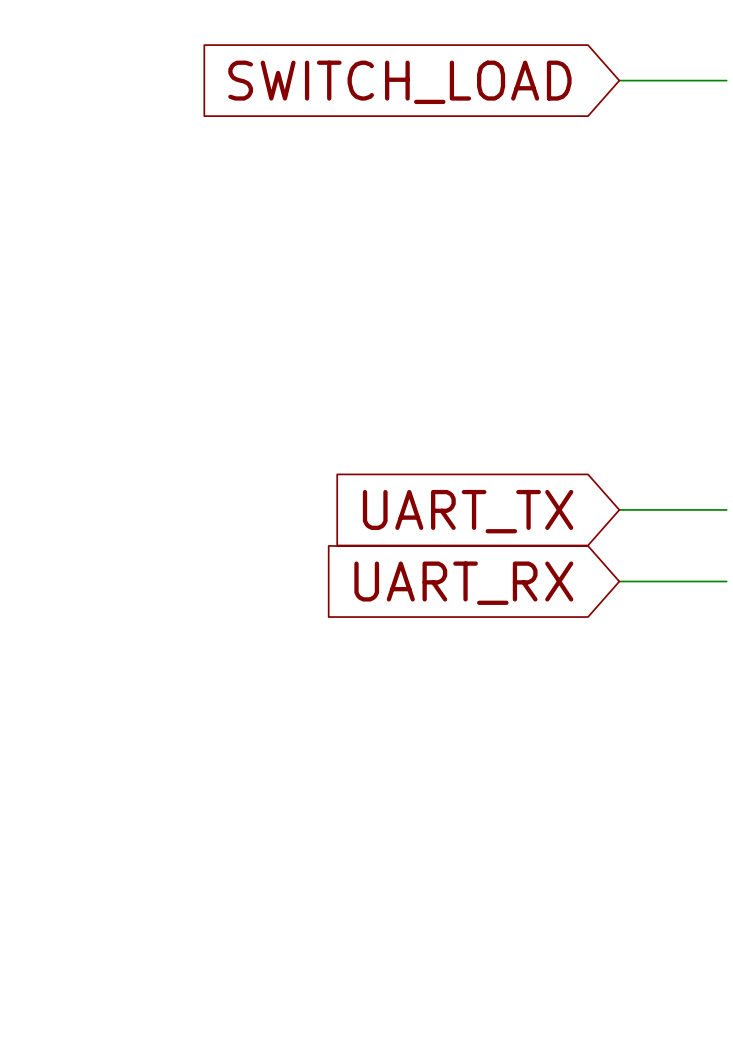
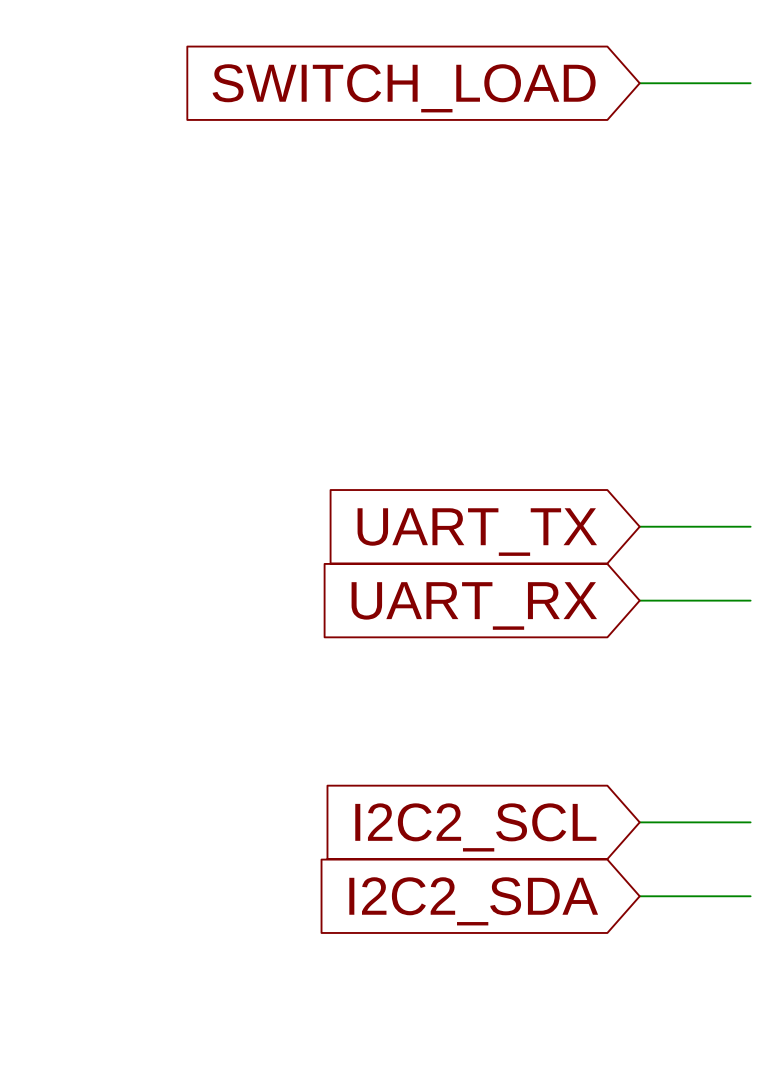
wire: none -> (639, 822) (750, 822)
global label: none -> I2C2_SCL (475, 827)
wire: none -> (639, 896) (750, 896)
global label: none -> I2C2_SDA (473, 901)

